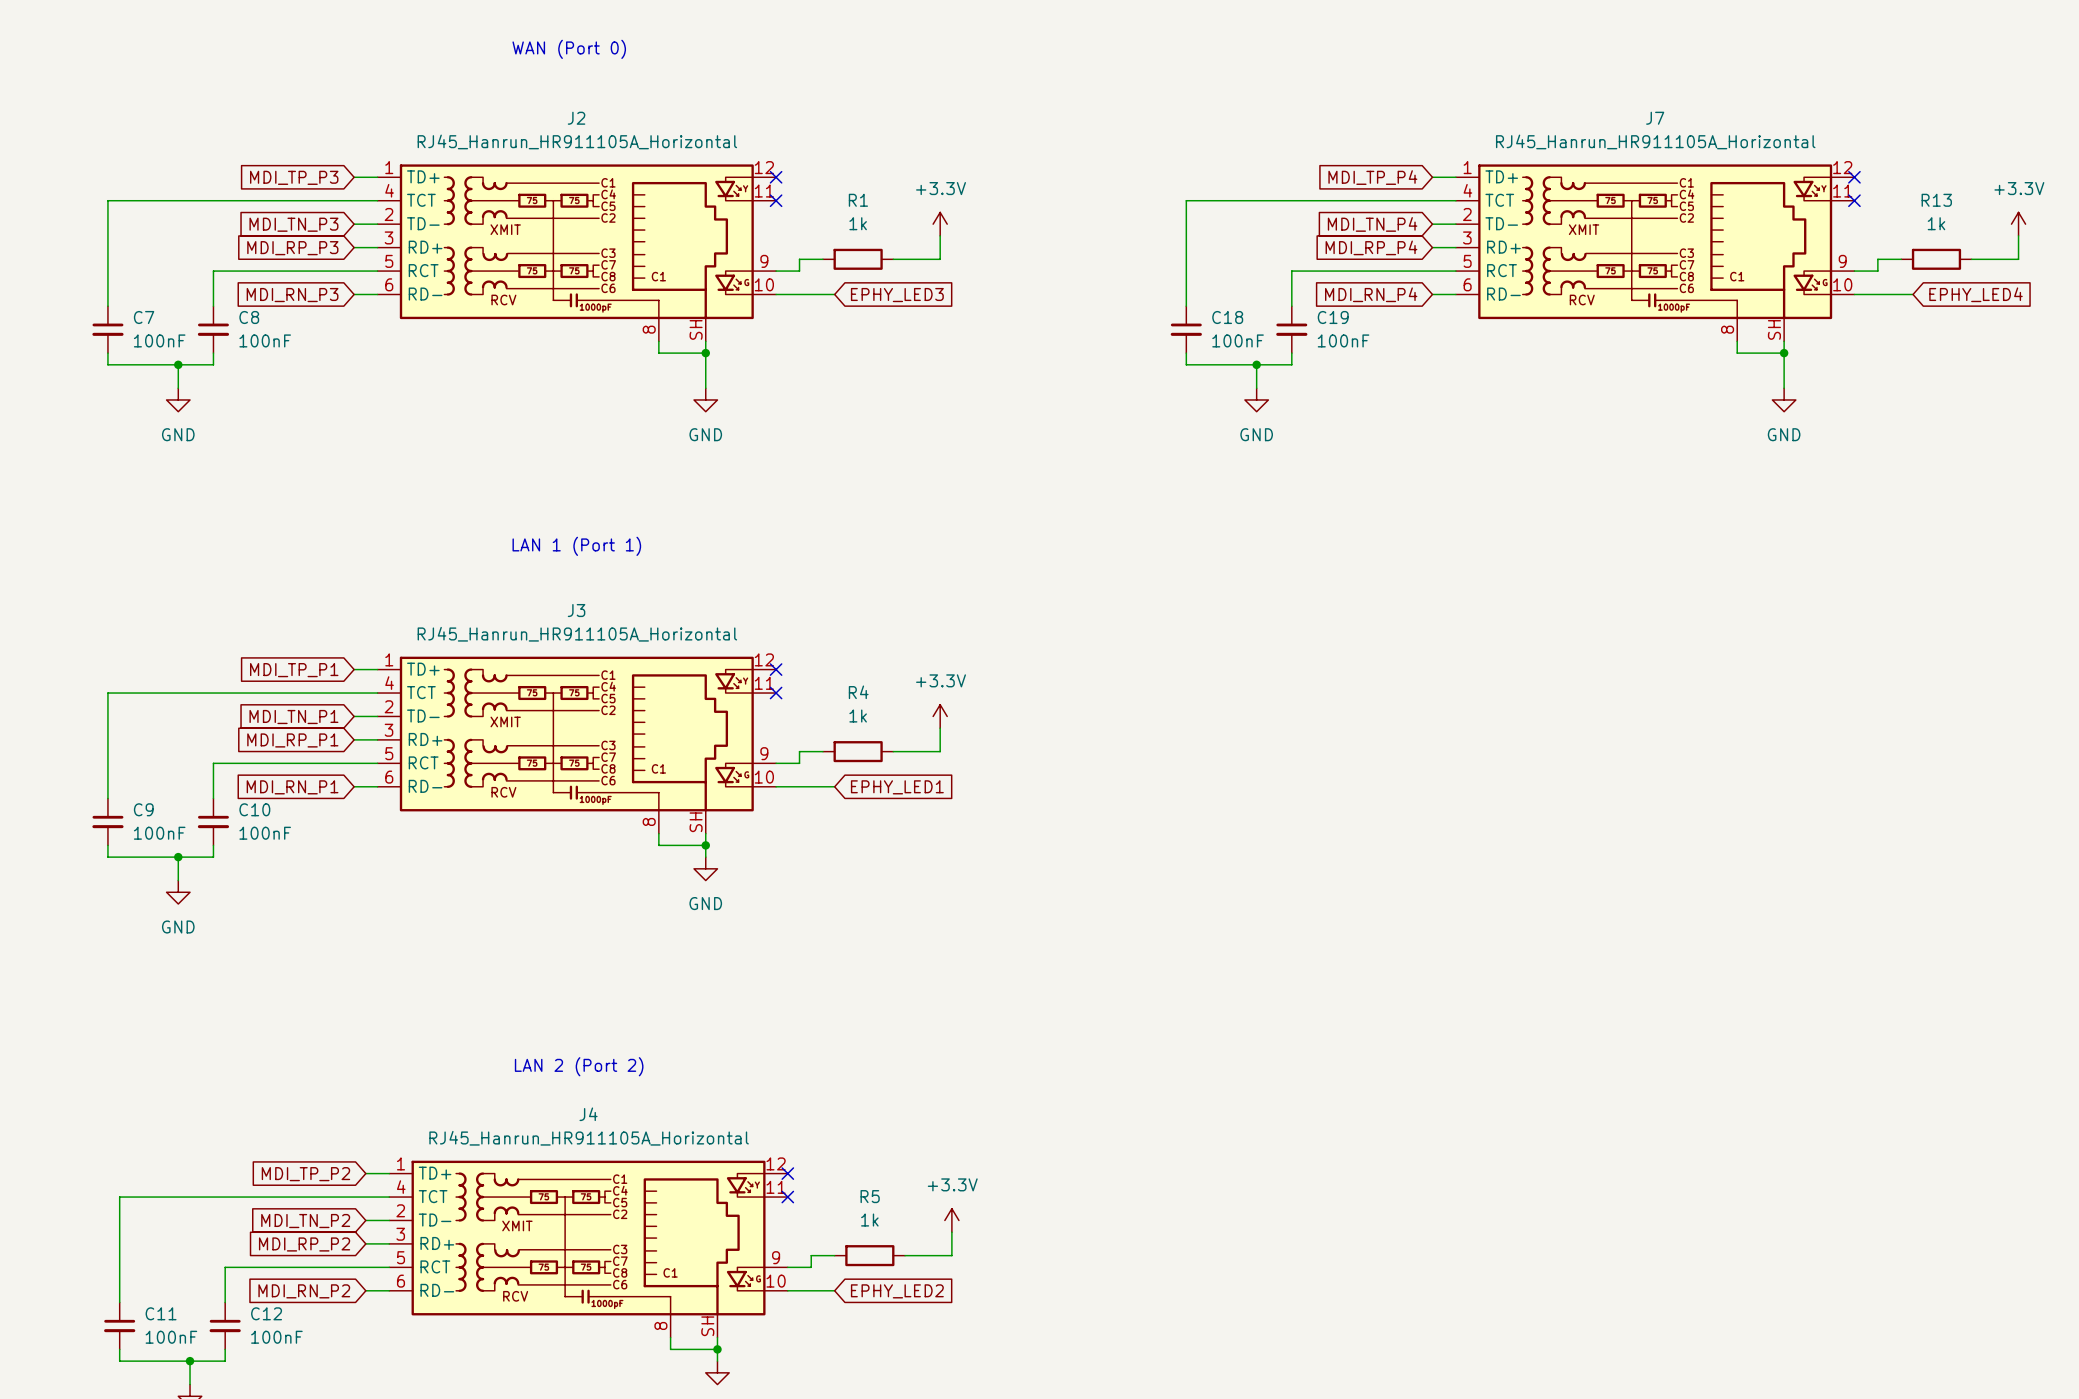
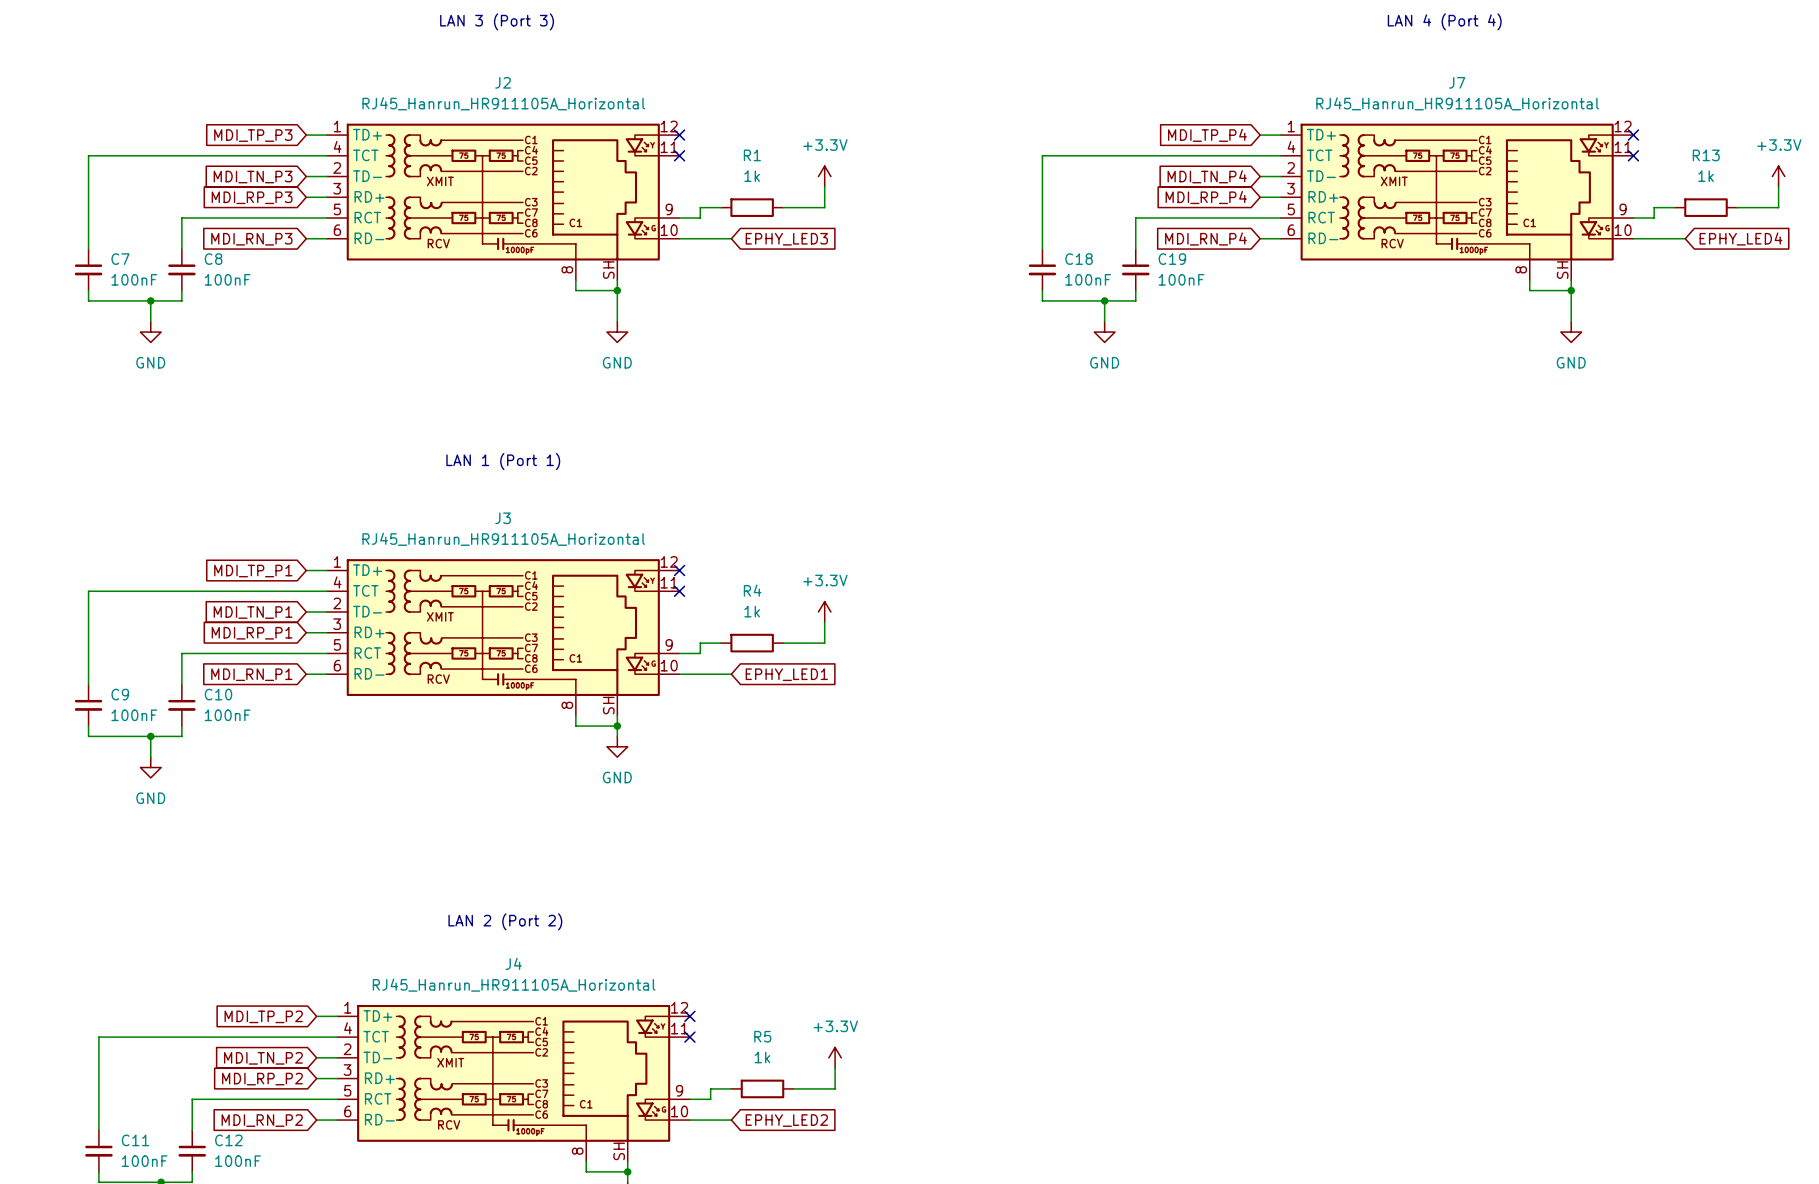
text: WAN (Port 0) (569, 49) -> LAN 3 (Port 3) (497, 21)
text: none -> LAN 4 (Port 4) (1444, 21)

